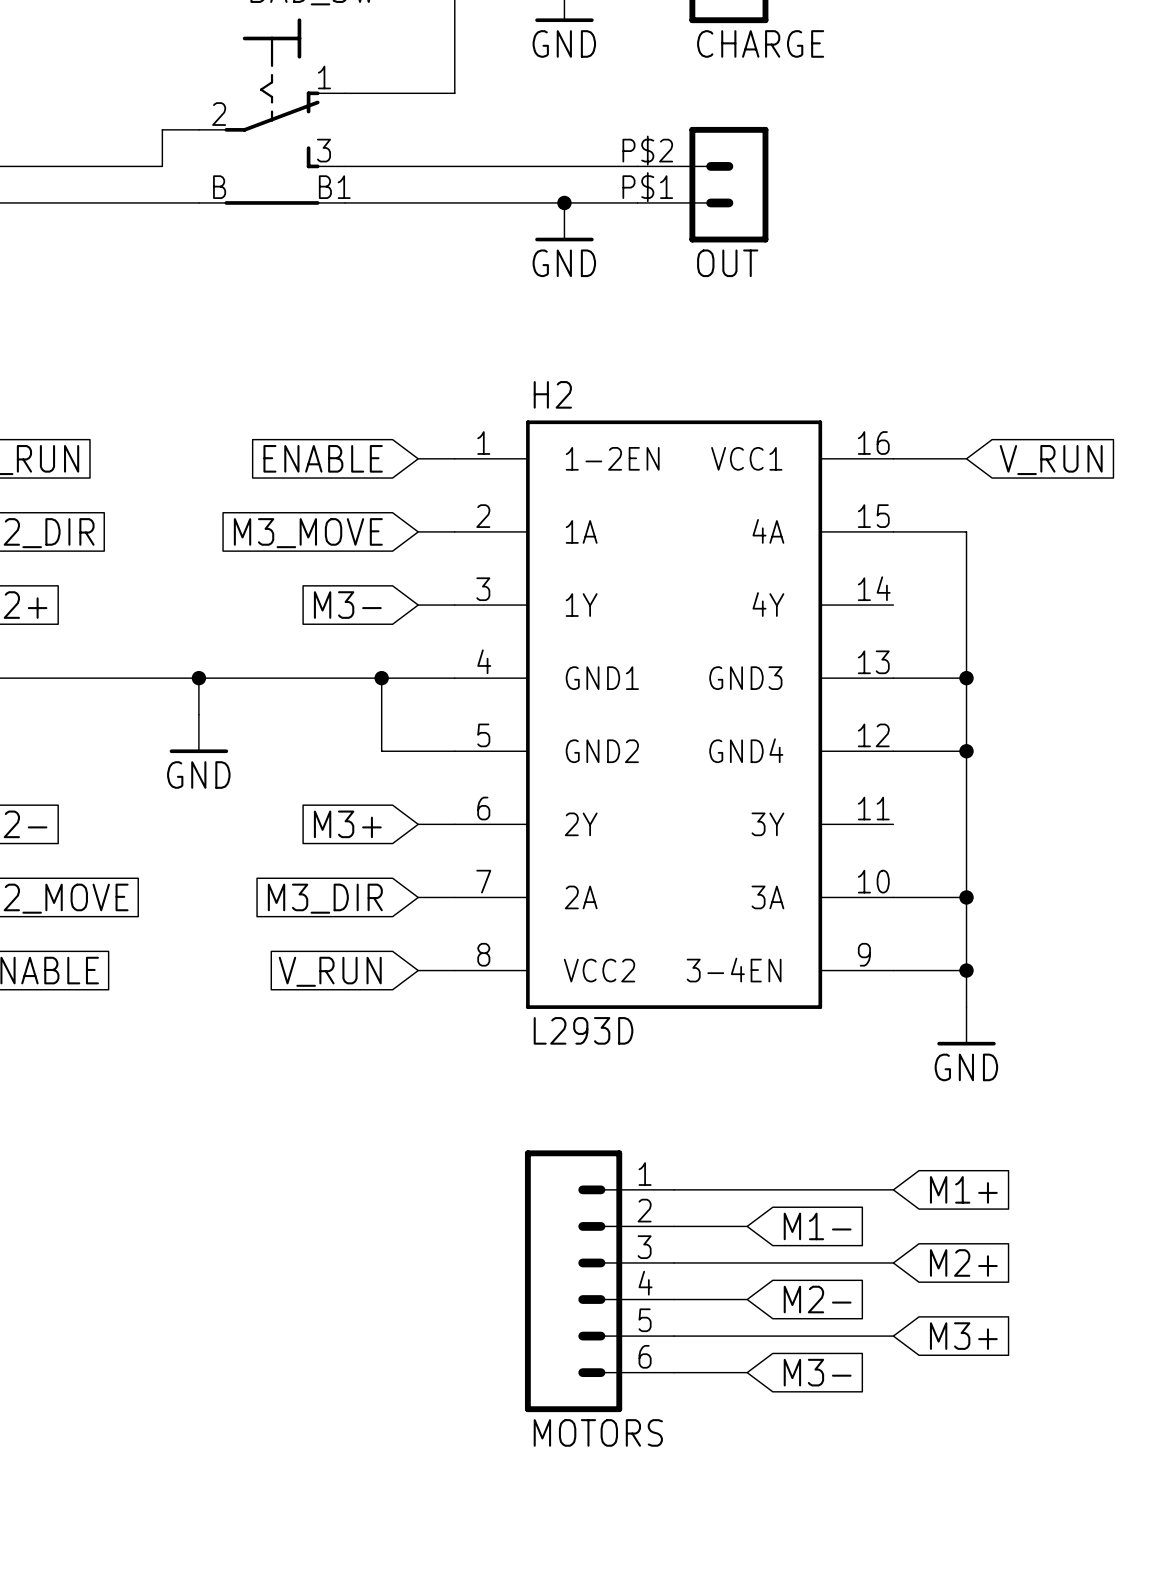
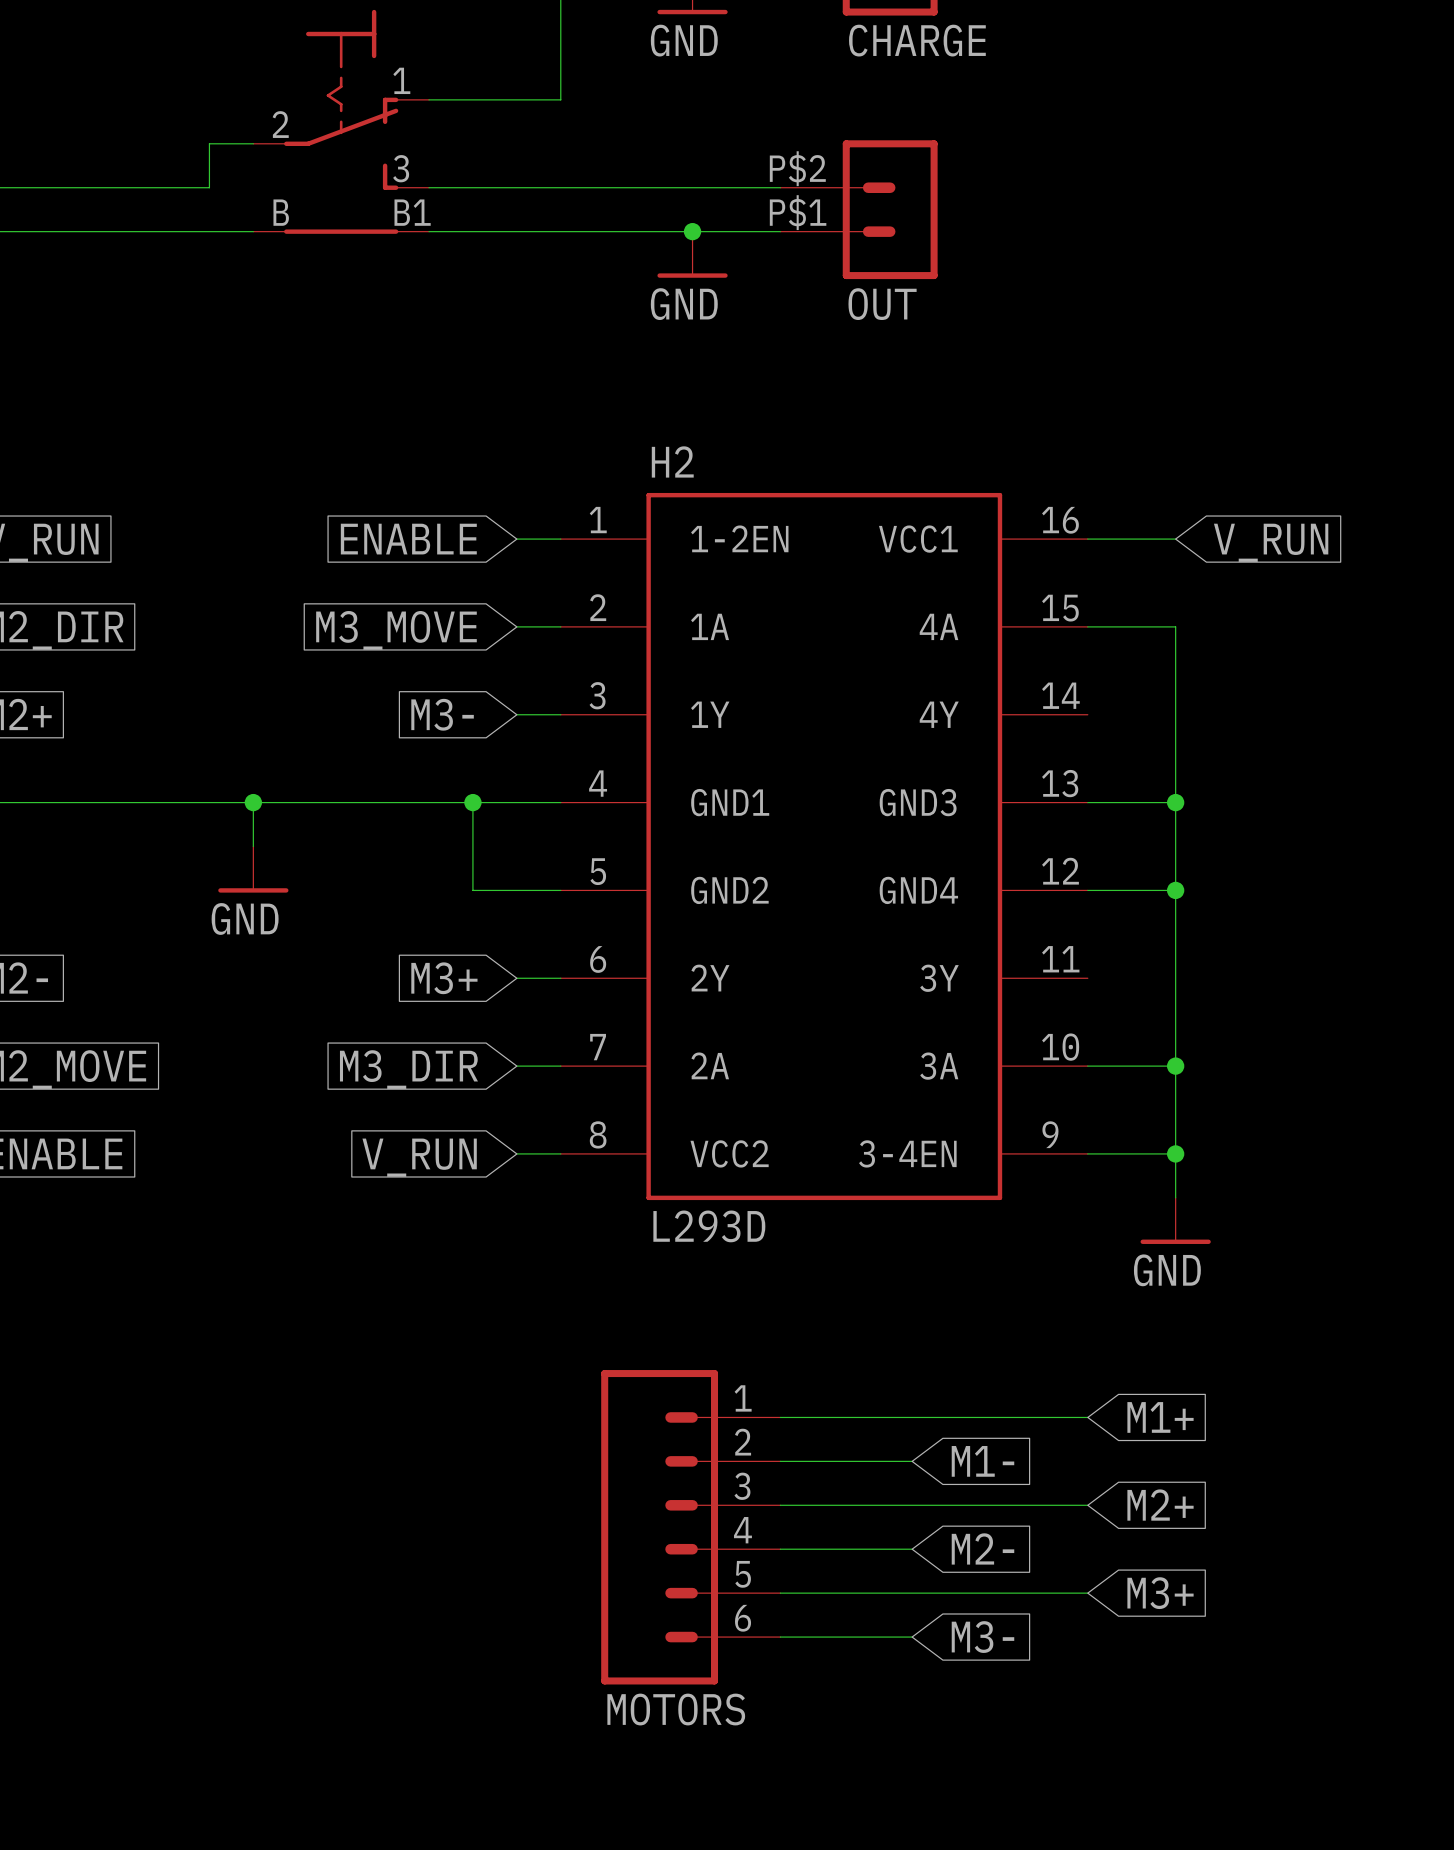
MOTORS position: (599, 1281) -> (690, 1527)

